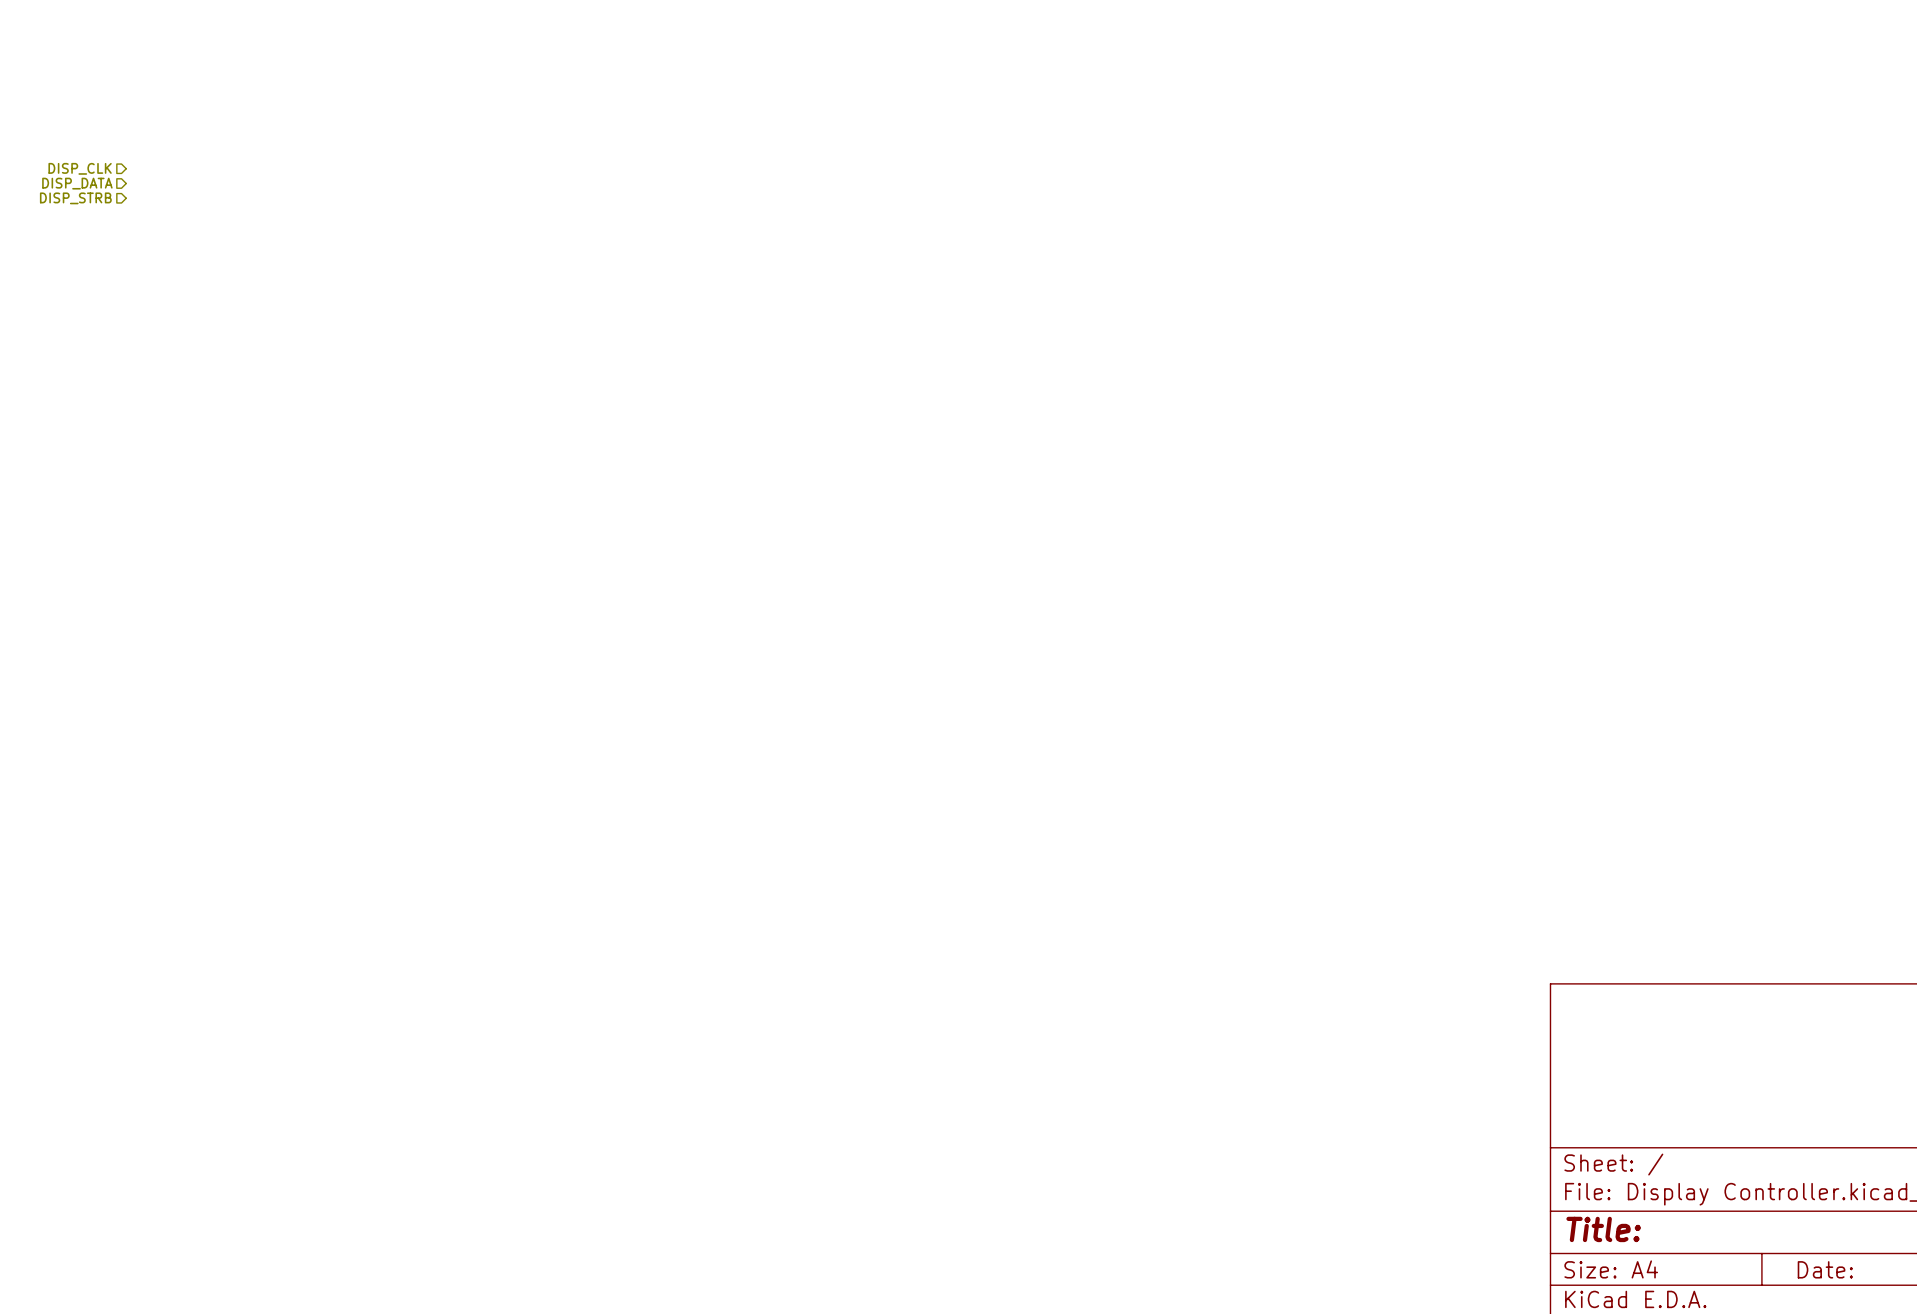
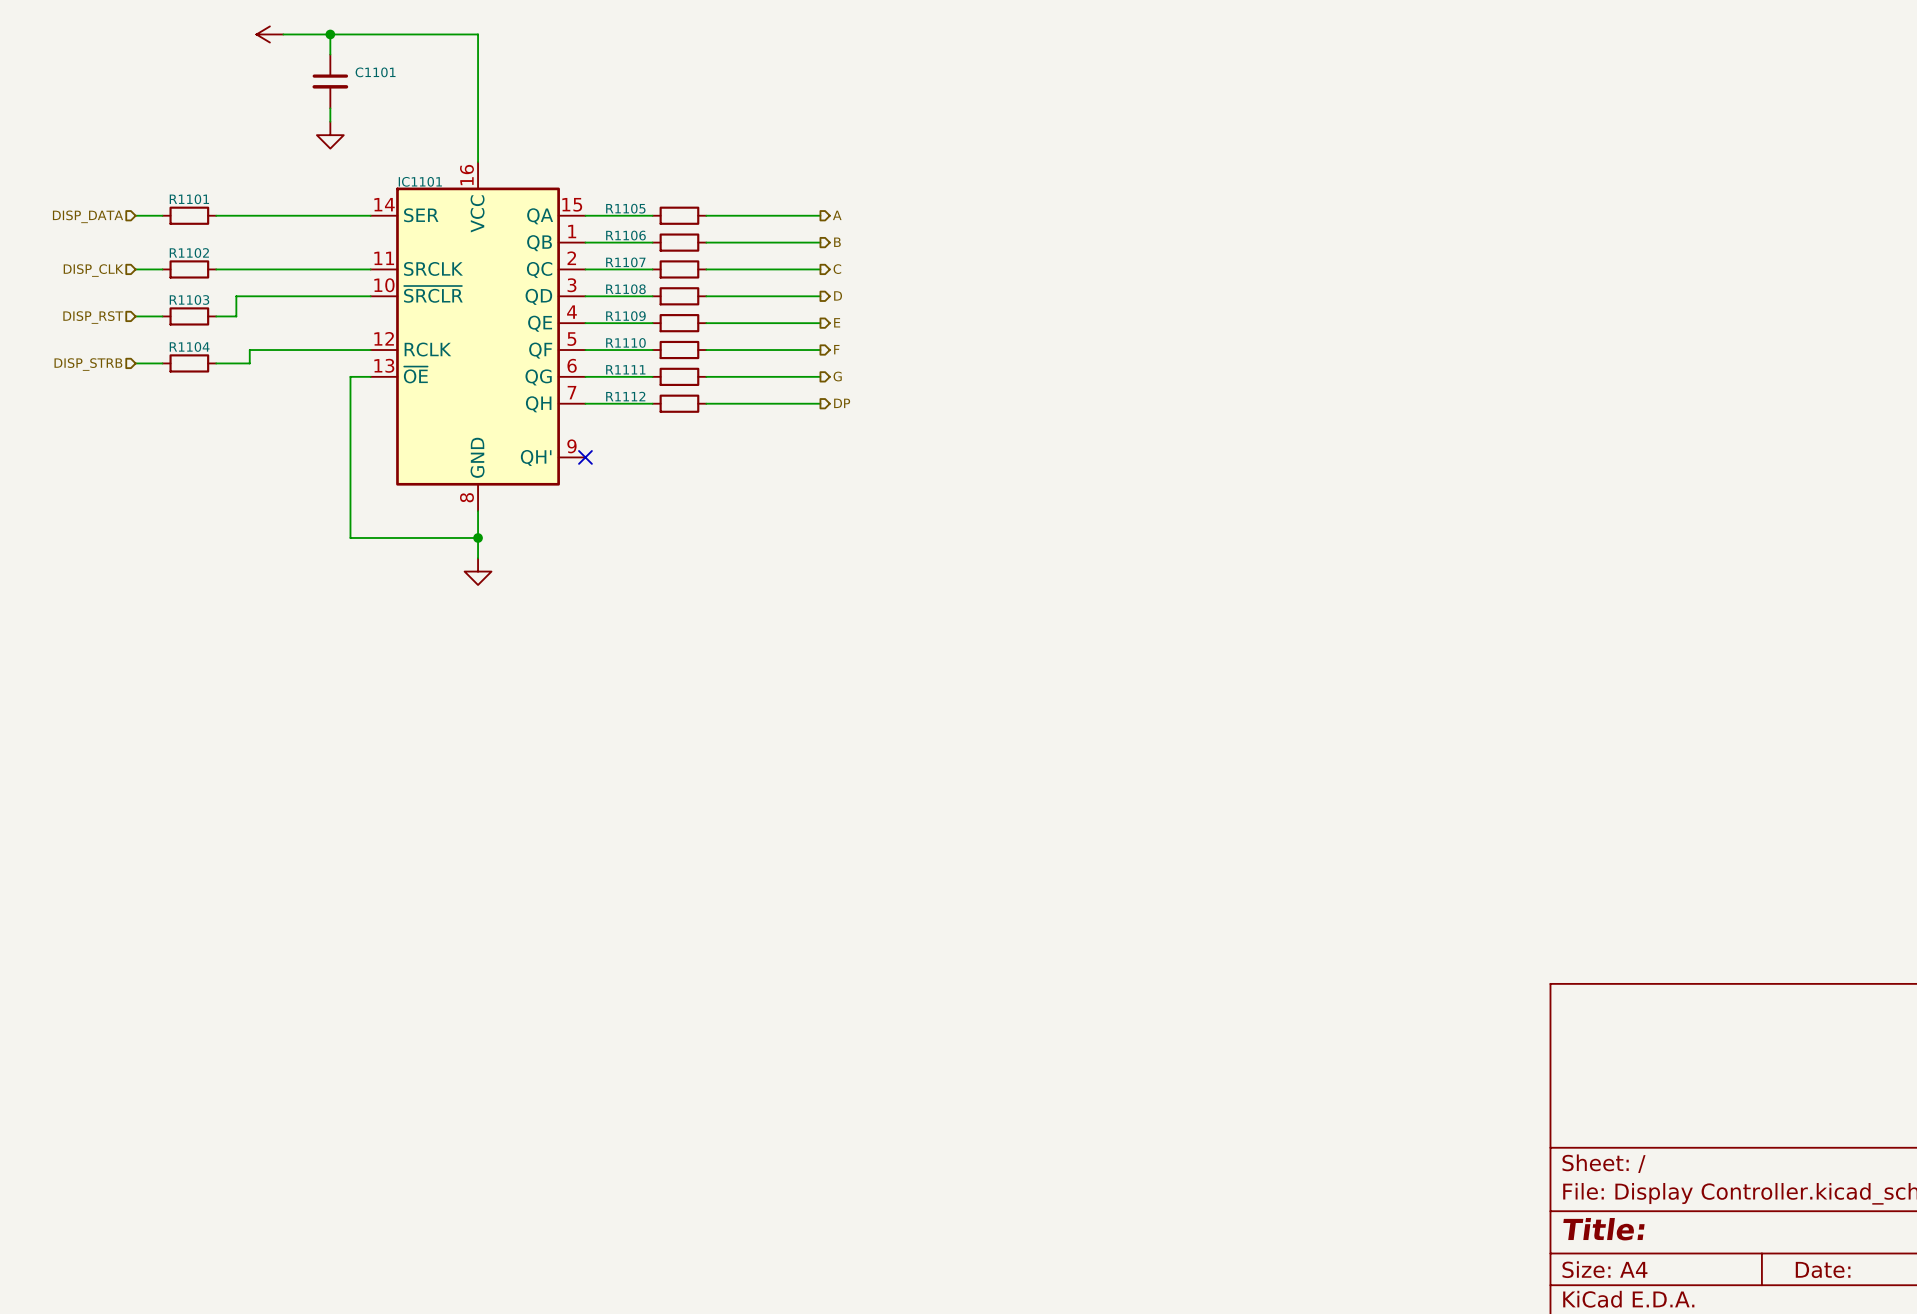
power symbol: none -> (269, 34)
wire: none -> (283, 34) (478, 34) (478, 162)
wire: none -> (330, 34) (330, 54)
junction: none -> (330, 34)
C1101: none -> (330, 81)
wire: none -> (330, 108) (330, 121)
power symbol: none -> (330, 135)
hierarchical label position: DISP_CLK (80, 168) -> DISP_CLK (93, 270)
hierarchical label position: DISP_DATA (77, 183) -> DISP_DATA (88, 216)
hierarchical label position: DISP_STRB (75, 198) -> DISP_STRB (88, 364)
wire: none -> (135, 215) (162, 215)
R1101: none -> (189, 215)
wire: none -> (216, 215) (370, 215)
wire: none -> (585, 215) (652, 215)
R1105: none -> (679, 215)
wire: none -> (706, 215) (820, 215)
hierarchical label: none -> A (837, 215)
wire: none -> (585, 242) (652, 242)
R1106: none -> (679, 242)
wire: none -> (706, 242) (820, 242)
hierarchical label: none -> B (837, 242)
wire: none -> (135, 269) (162, 269)
R1102: none -> (189, 269)
wire: none -> (216, 269) (370, 269)
wire: none -> (585, 269) (652, 269)
R1107: none -> (679, 269)
wire: none -> (706, 269) (820, 269)
hierarchical label: none -> C (837, 269)
hierarchical label: none -> D (838, 295)
wire: none -> (370, 296) (236, 296) (236, 316) (216, 316)
wire: none -> (585, 296) (652, 296)
R1108: none -> (679, 296)
wire: none -> (706, 296) (820, 296)
hierarchical label: none -> DISP_RST (93, 317)
wire: none -> (135, 316) (162, 316)
R1103: none -> (189, 316)
hierarchical label: none -> E (837, 322)
wire: none -> (585, 323) (652, 323)
R1109: none -> (679, 323)
wire: none -> (706, 323) (820, 323)
IC1101: none -> (478, 336)
hierarchical label: none -> F (836, 349)
wire: none -> (370, 350) (249, 350) (249, 363) (216, 363)
wire: none -> (585, 350) (652, 350)
R1110: none -> (679, 350)
wire: none -> (706, 350) (820, 350)
wire: none -> (135, 363) (162, 363)
R1104: none -> (189, 363)
wire: none -> (370, 376) (350, 376) (350, 537) (478, 537)
wire: none -> (585, 376) (652, 376)
R1111: none -> (679, 376)
wire: none -> (706, 376) (820, 376)
hierarchical label: none -> G (837, 376)
wire: none -> (585, 403) (652, 403)
R1112: none -> (679, 403)
wire: none -> (706, 403) (820, 403)
hierarchical label: none -> DP (842, 403)
no-connect mark: none -> (585, 457)
wire: none -> (478, 511) (478, 558)
junction: none -> (478, 537)
power symbol: none -> (478, 571)

